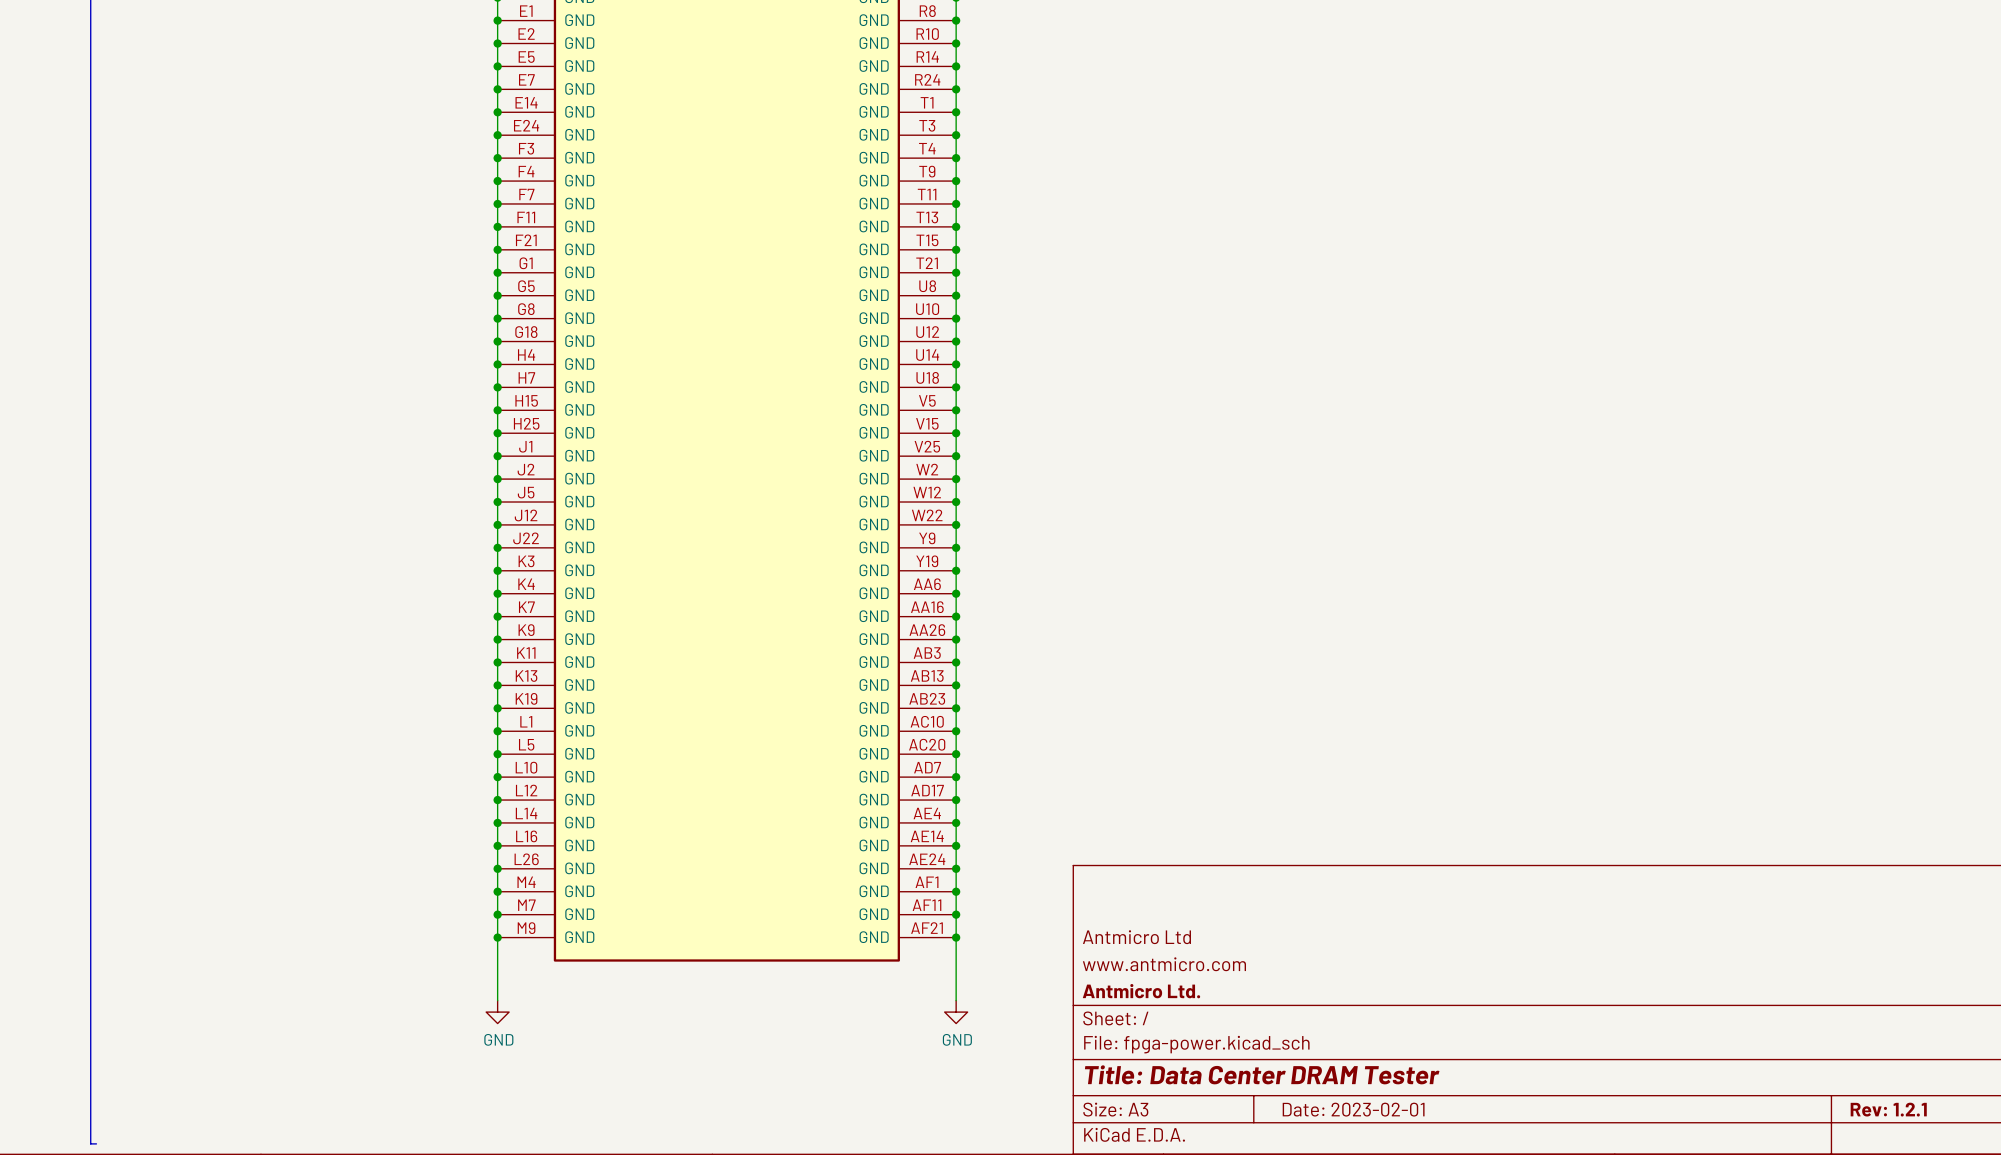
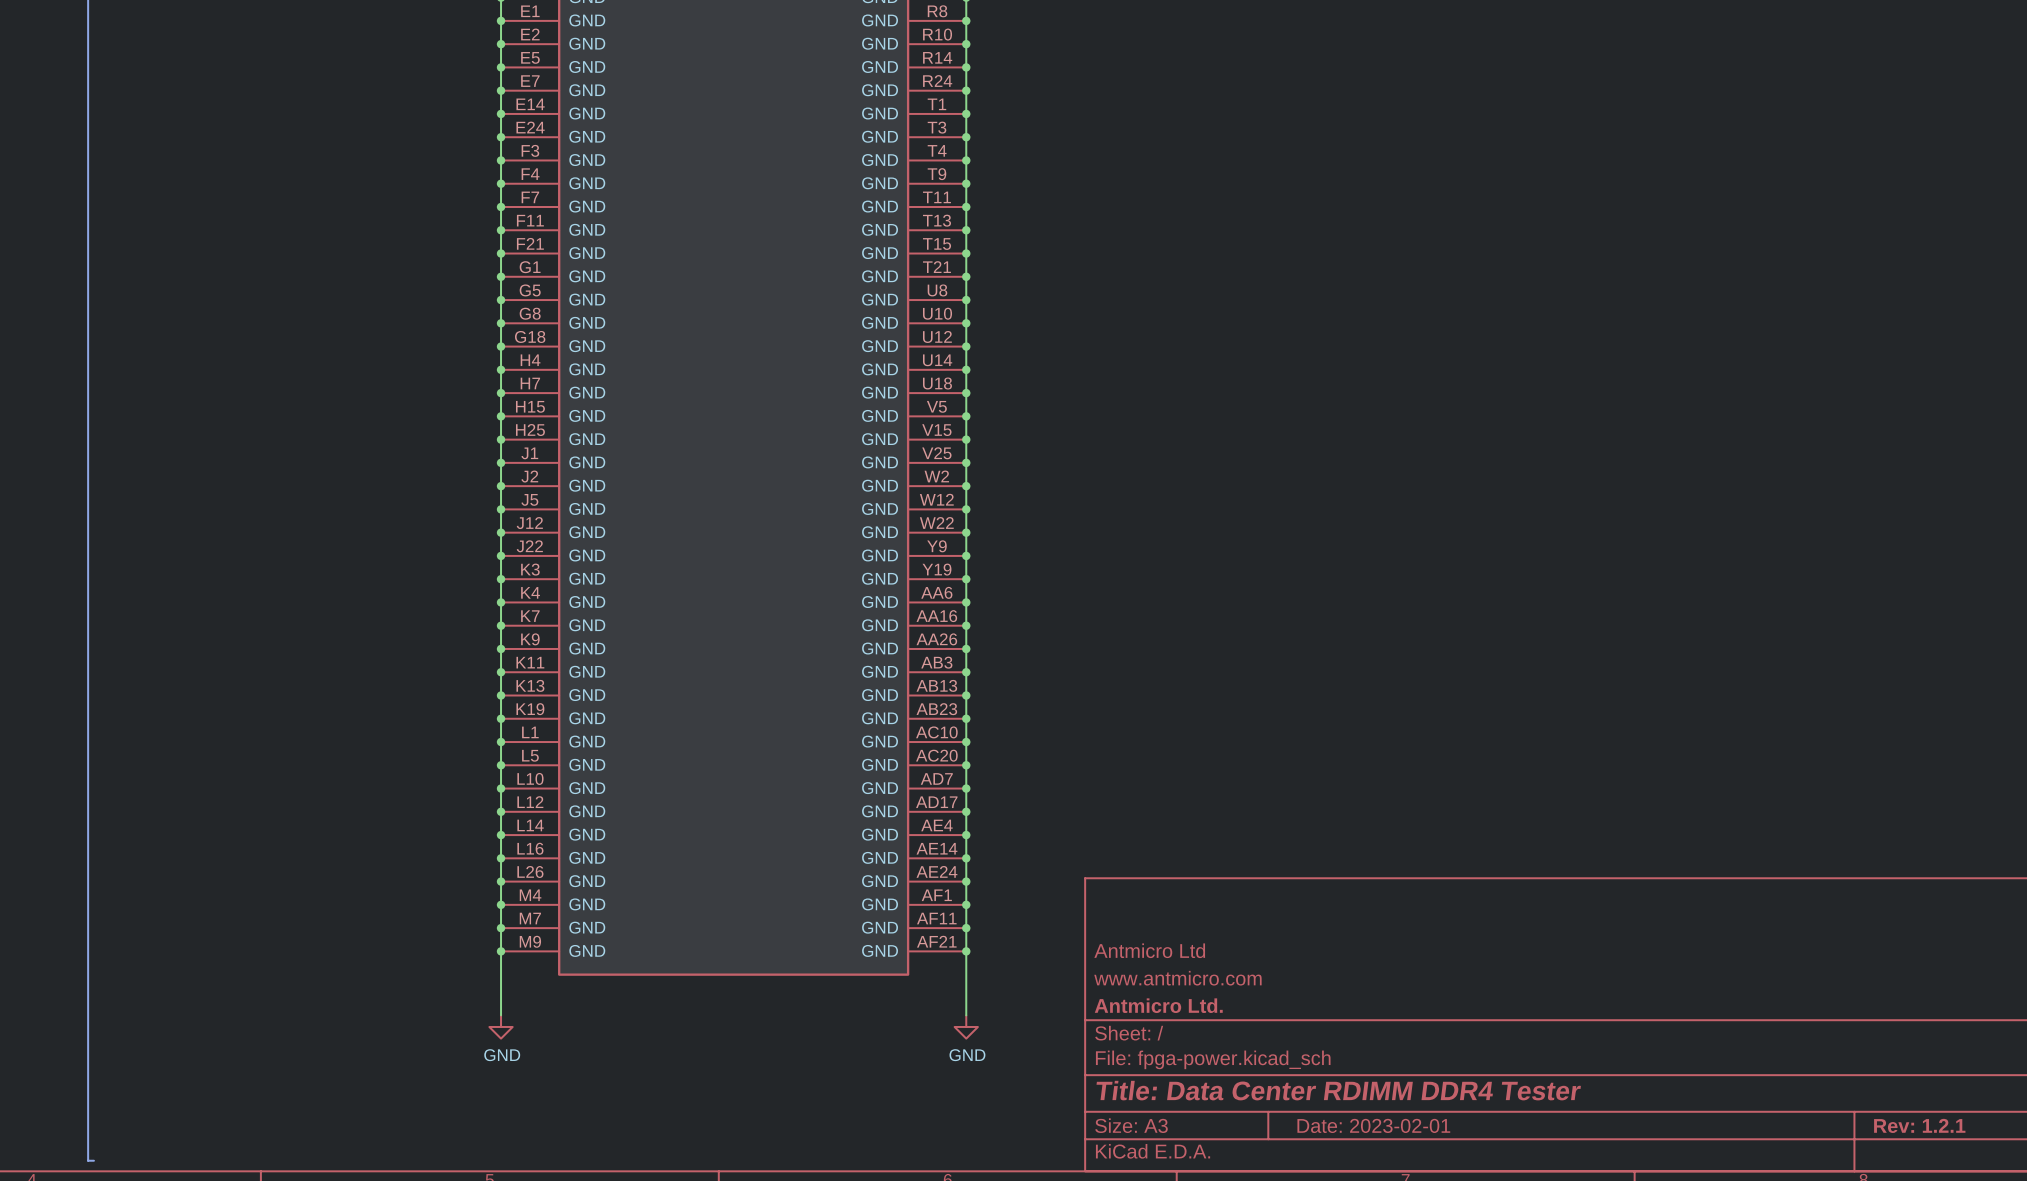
title block: Title: Data Center DRAM Tester (1262, 1074) -> Title: Data Center RDIMM DDR4 Tester (1338, 1090)

